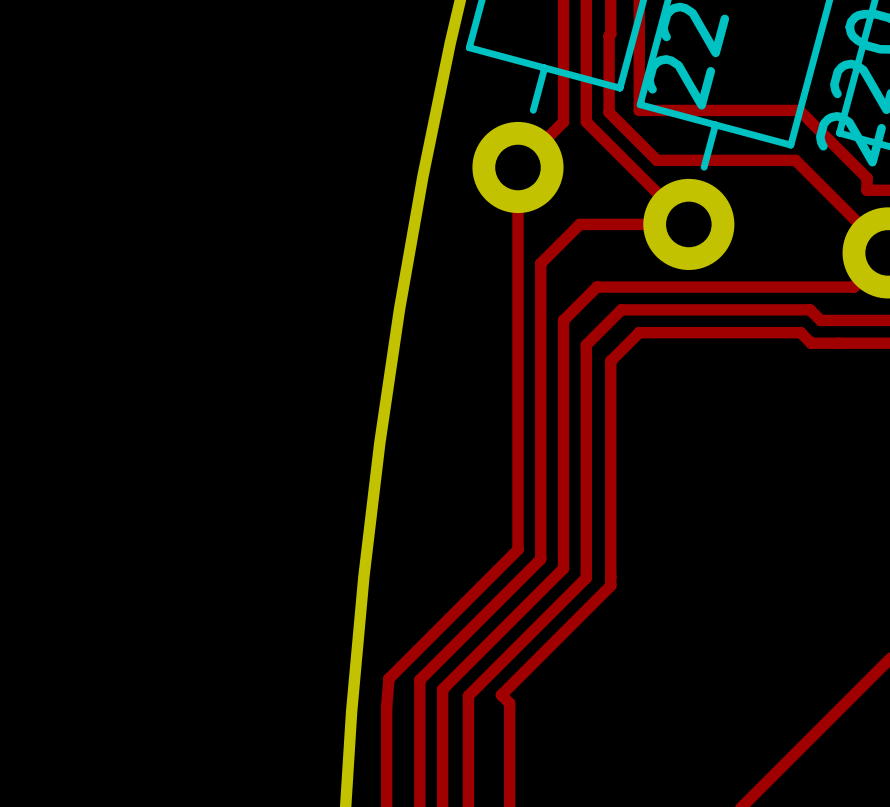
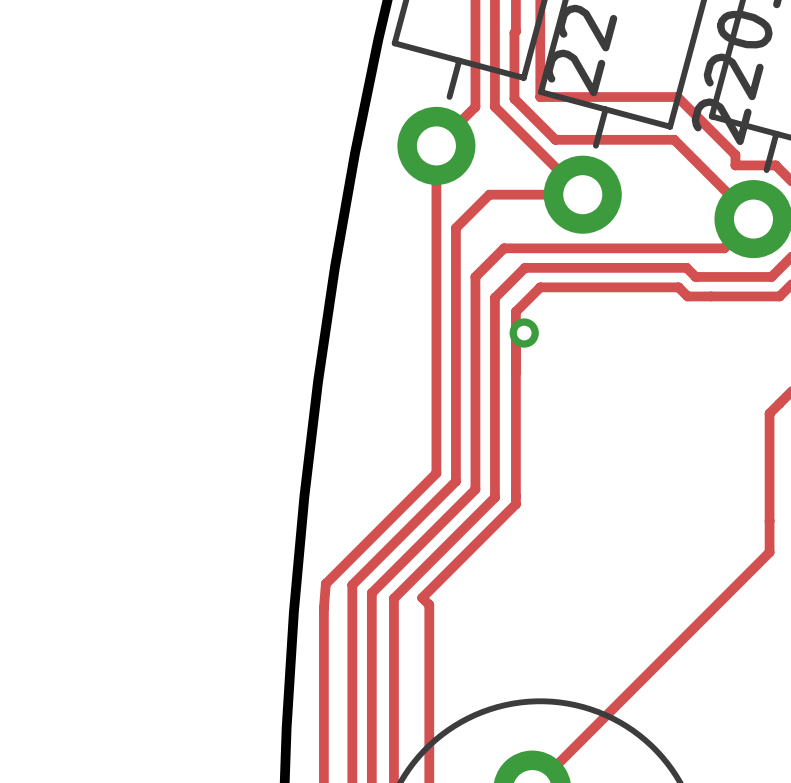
via: none -> (524, 333)

